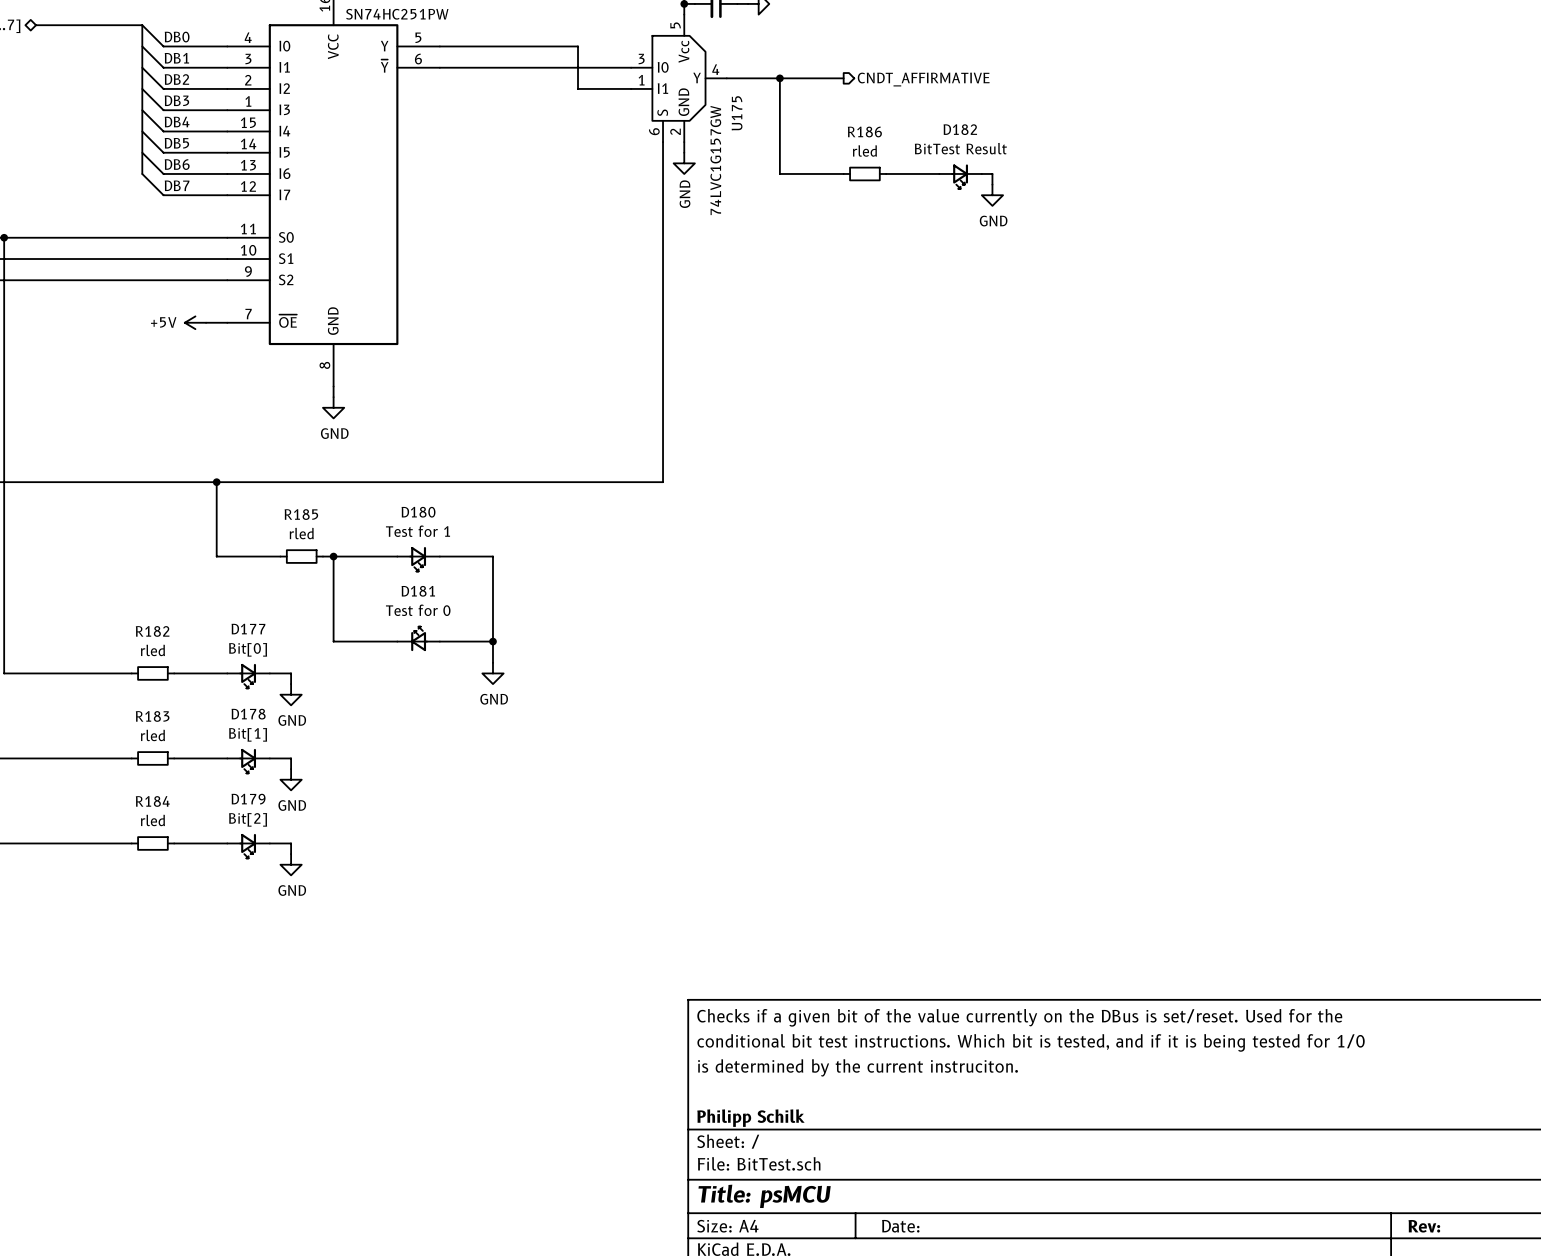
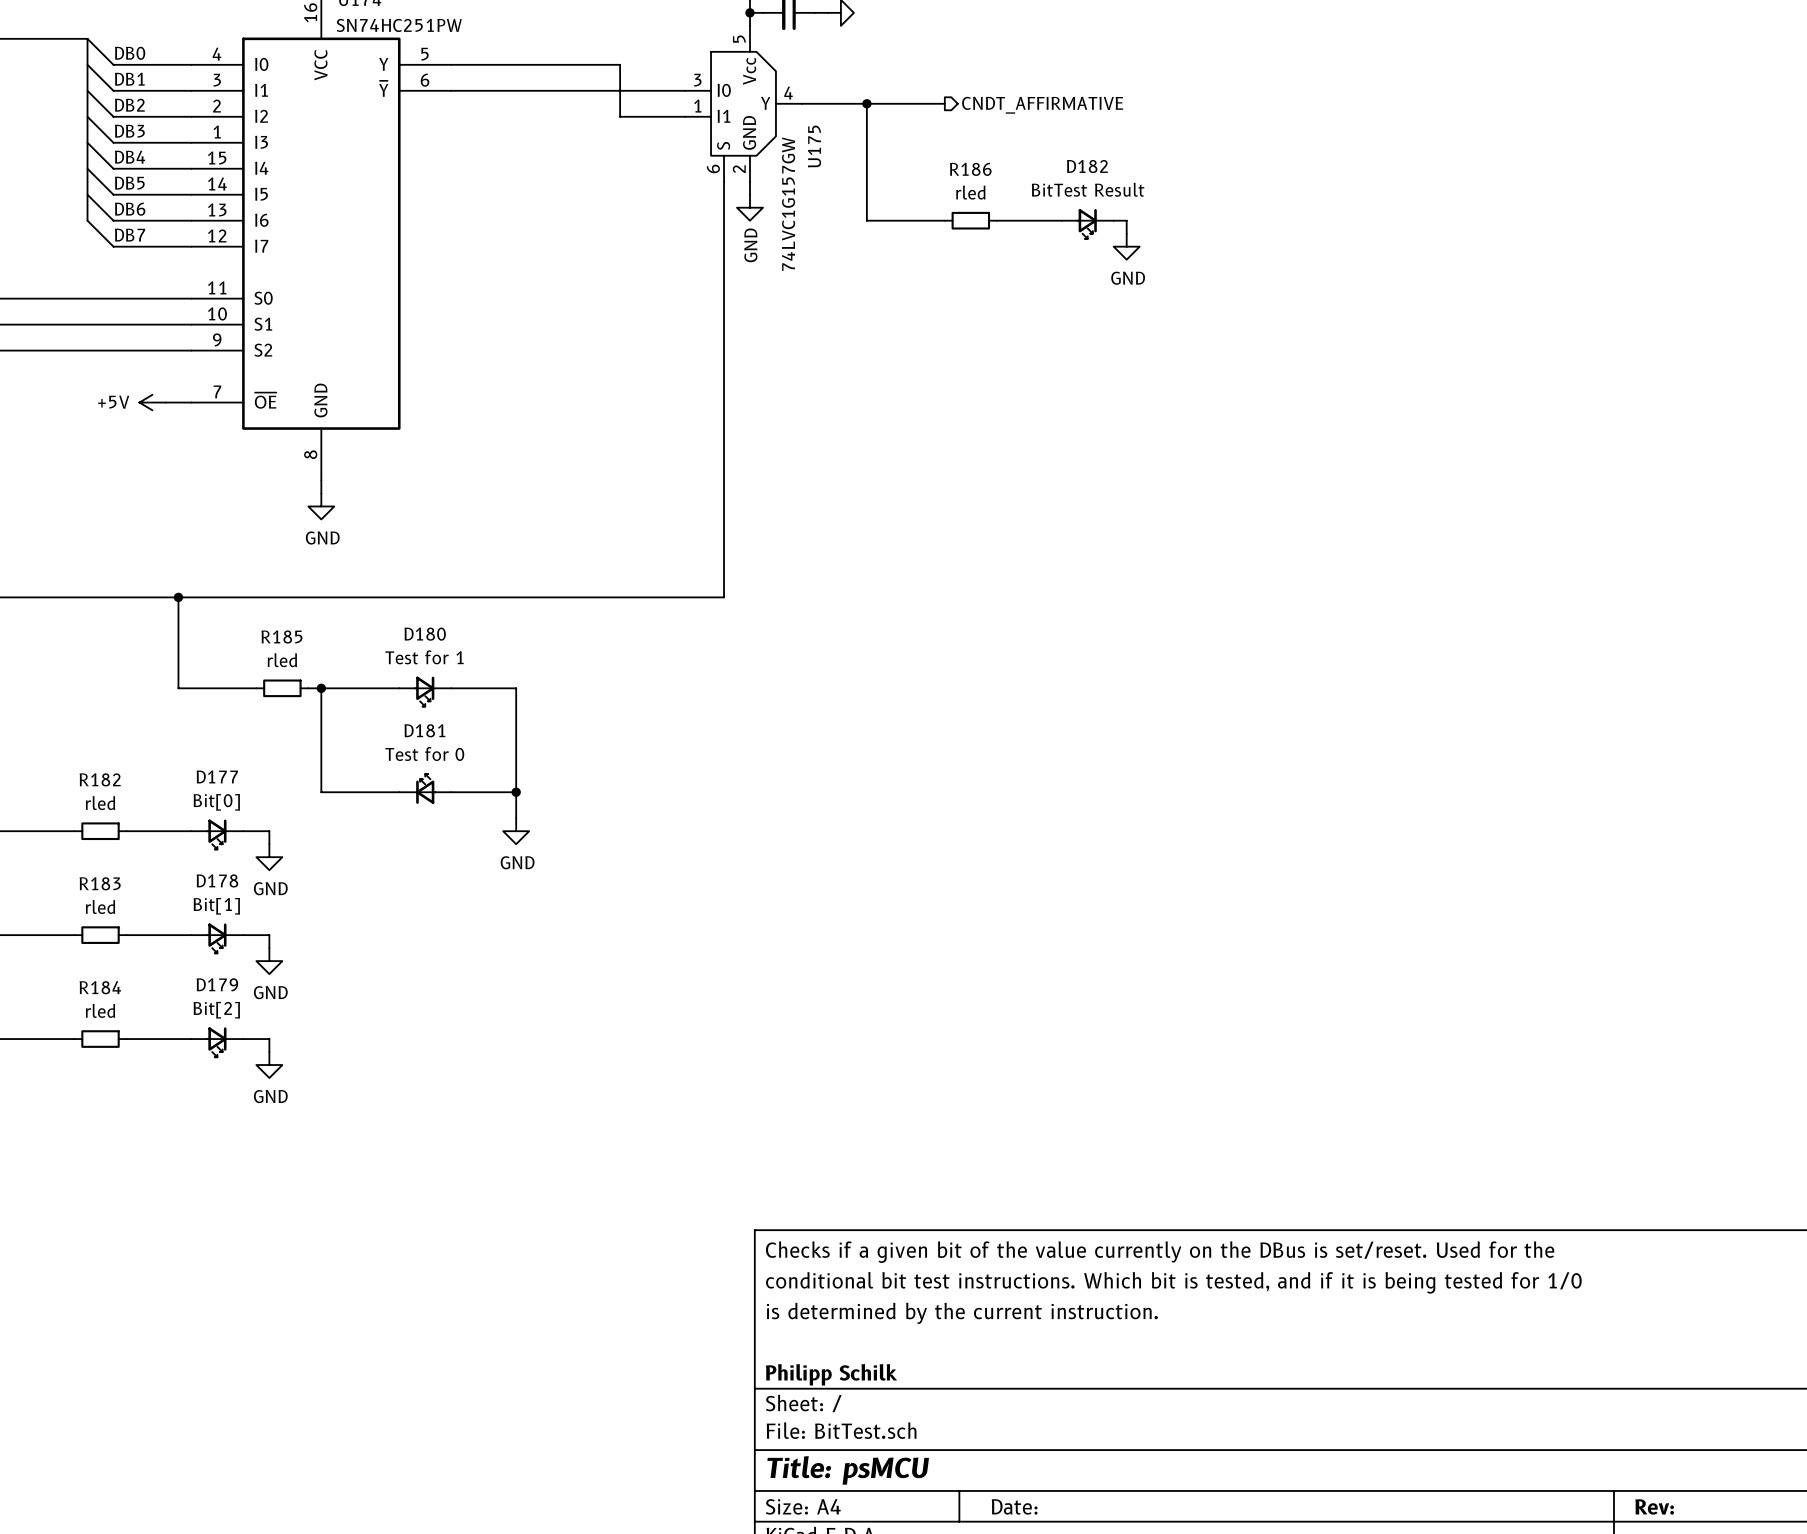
title block: is determined by the current instruciton. (858, 1067) -> is determined by the current instruction. (962, 1313)

